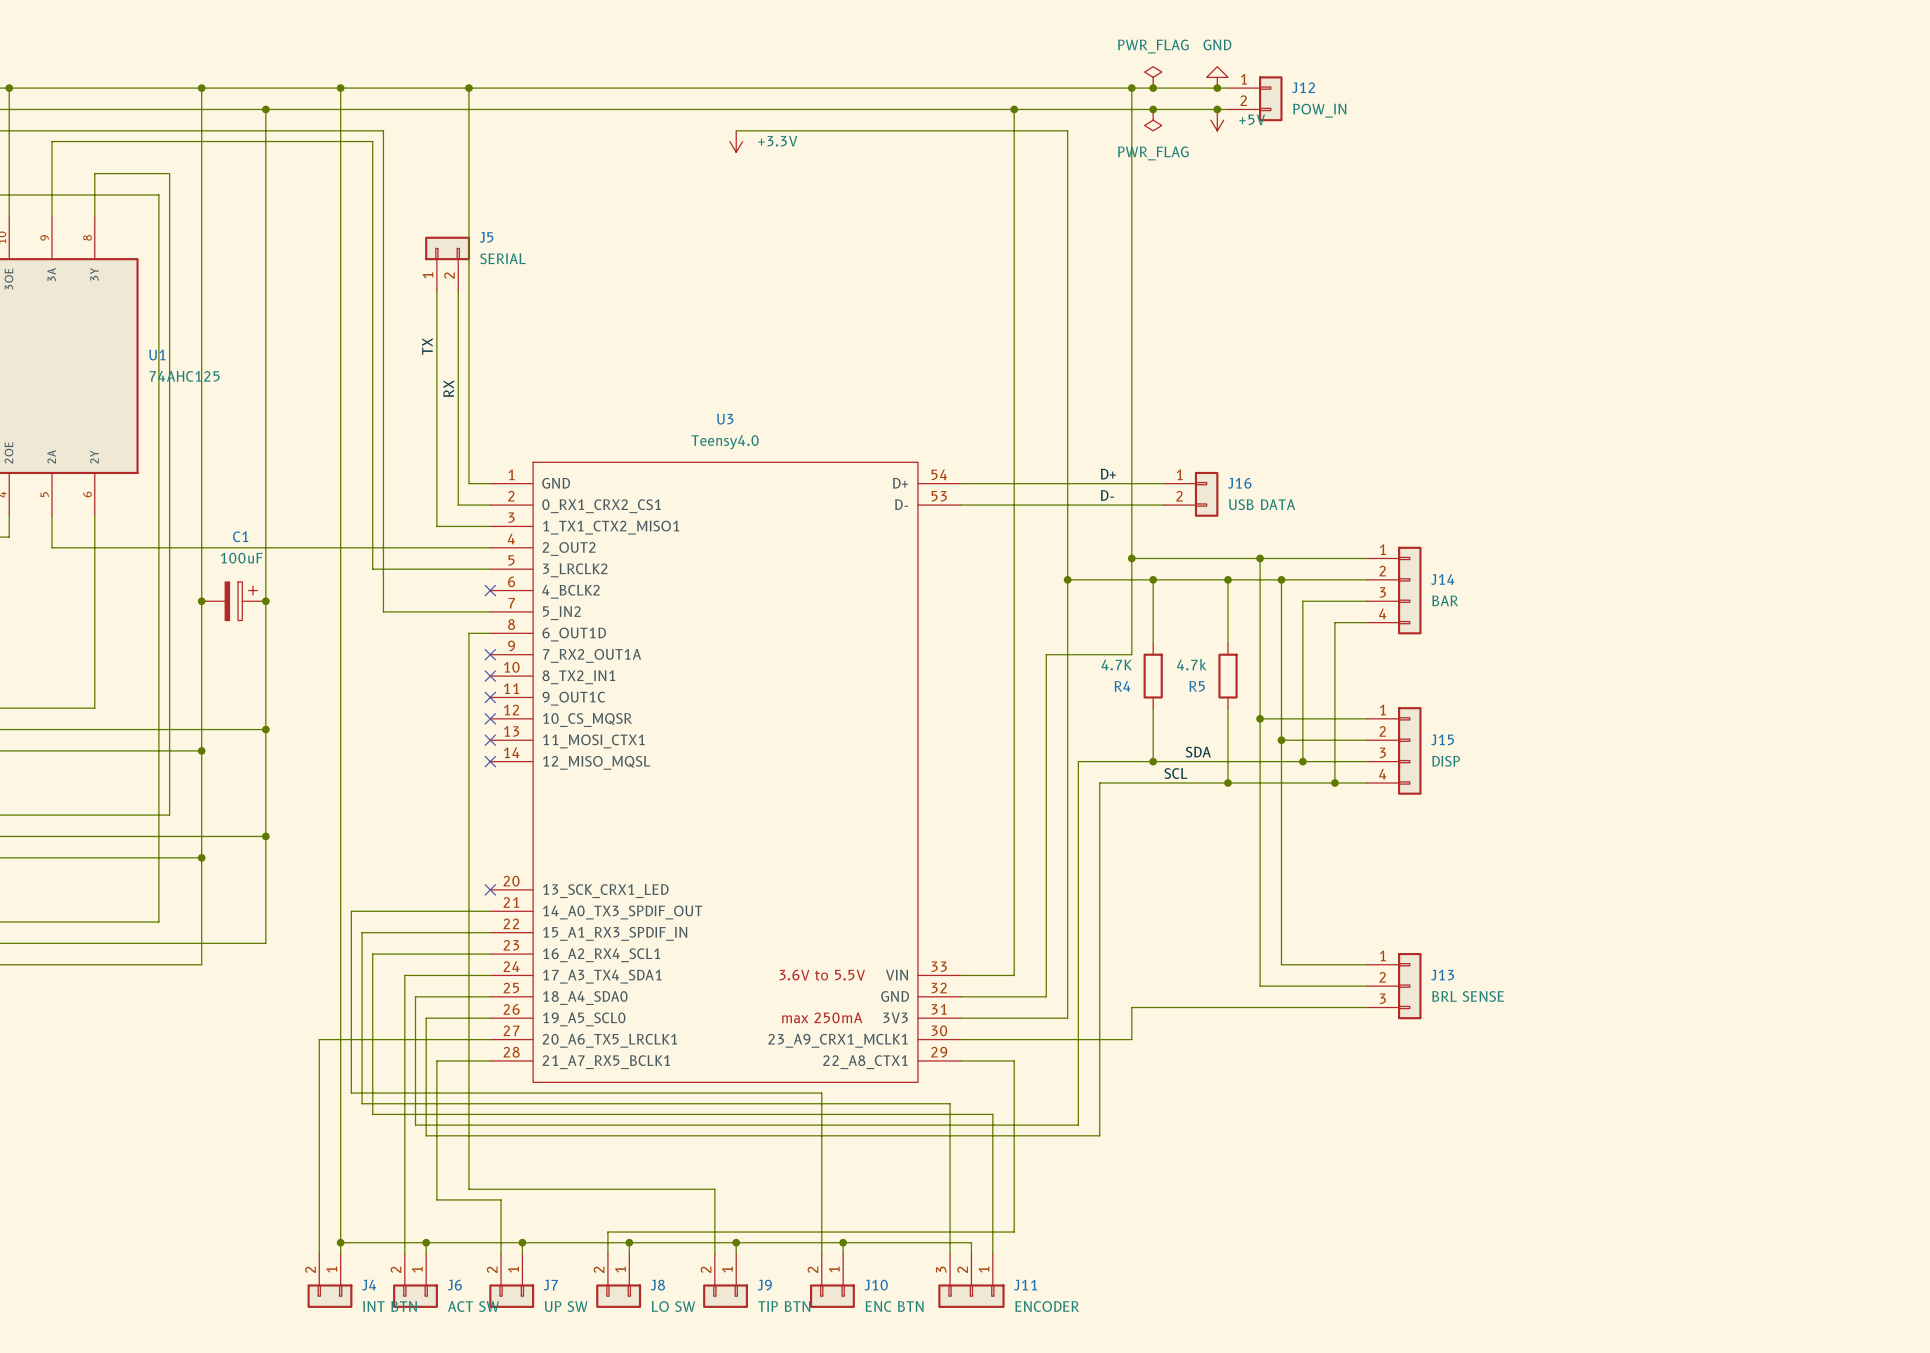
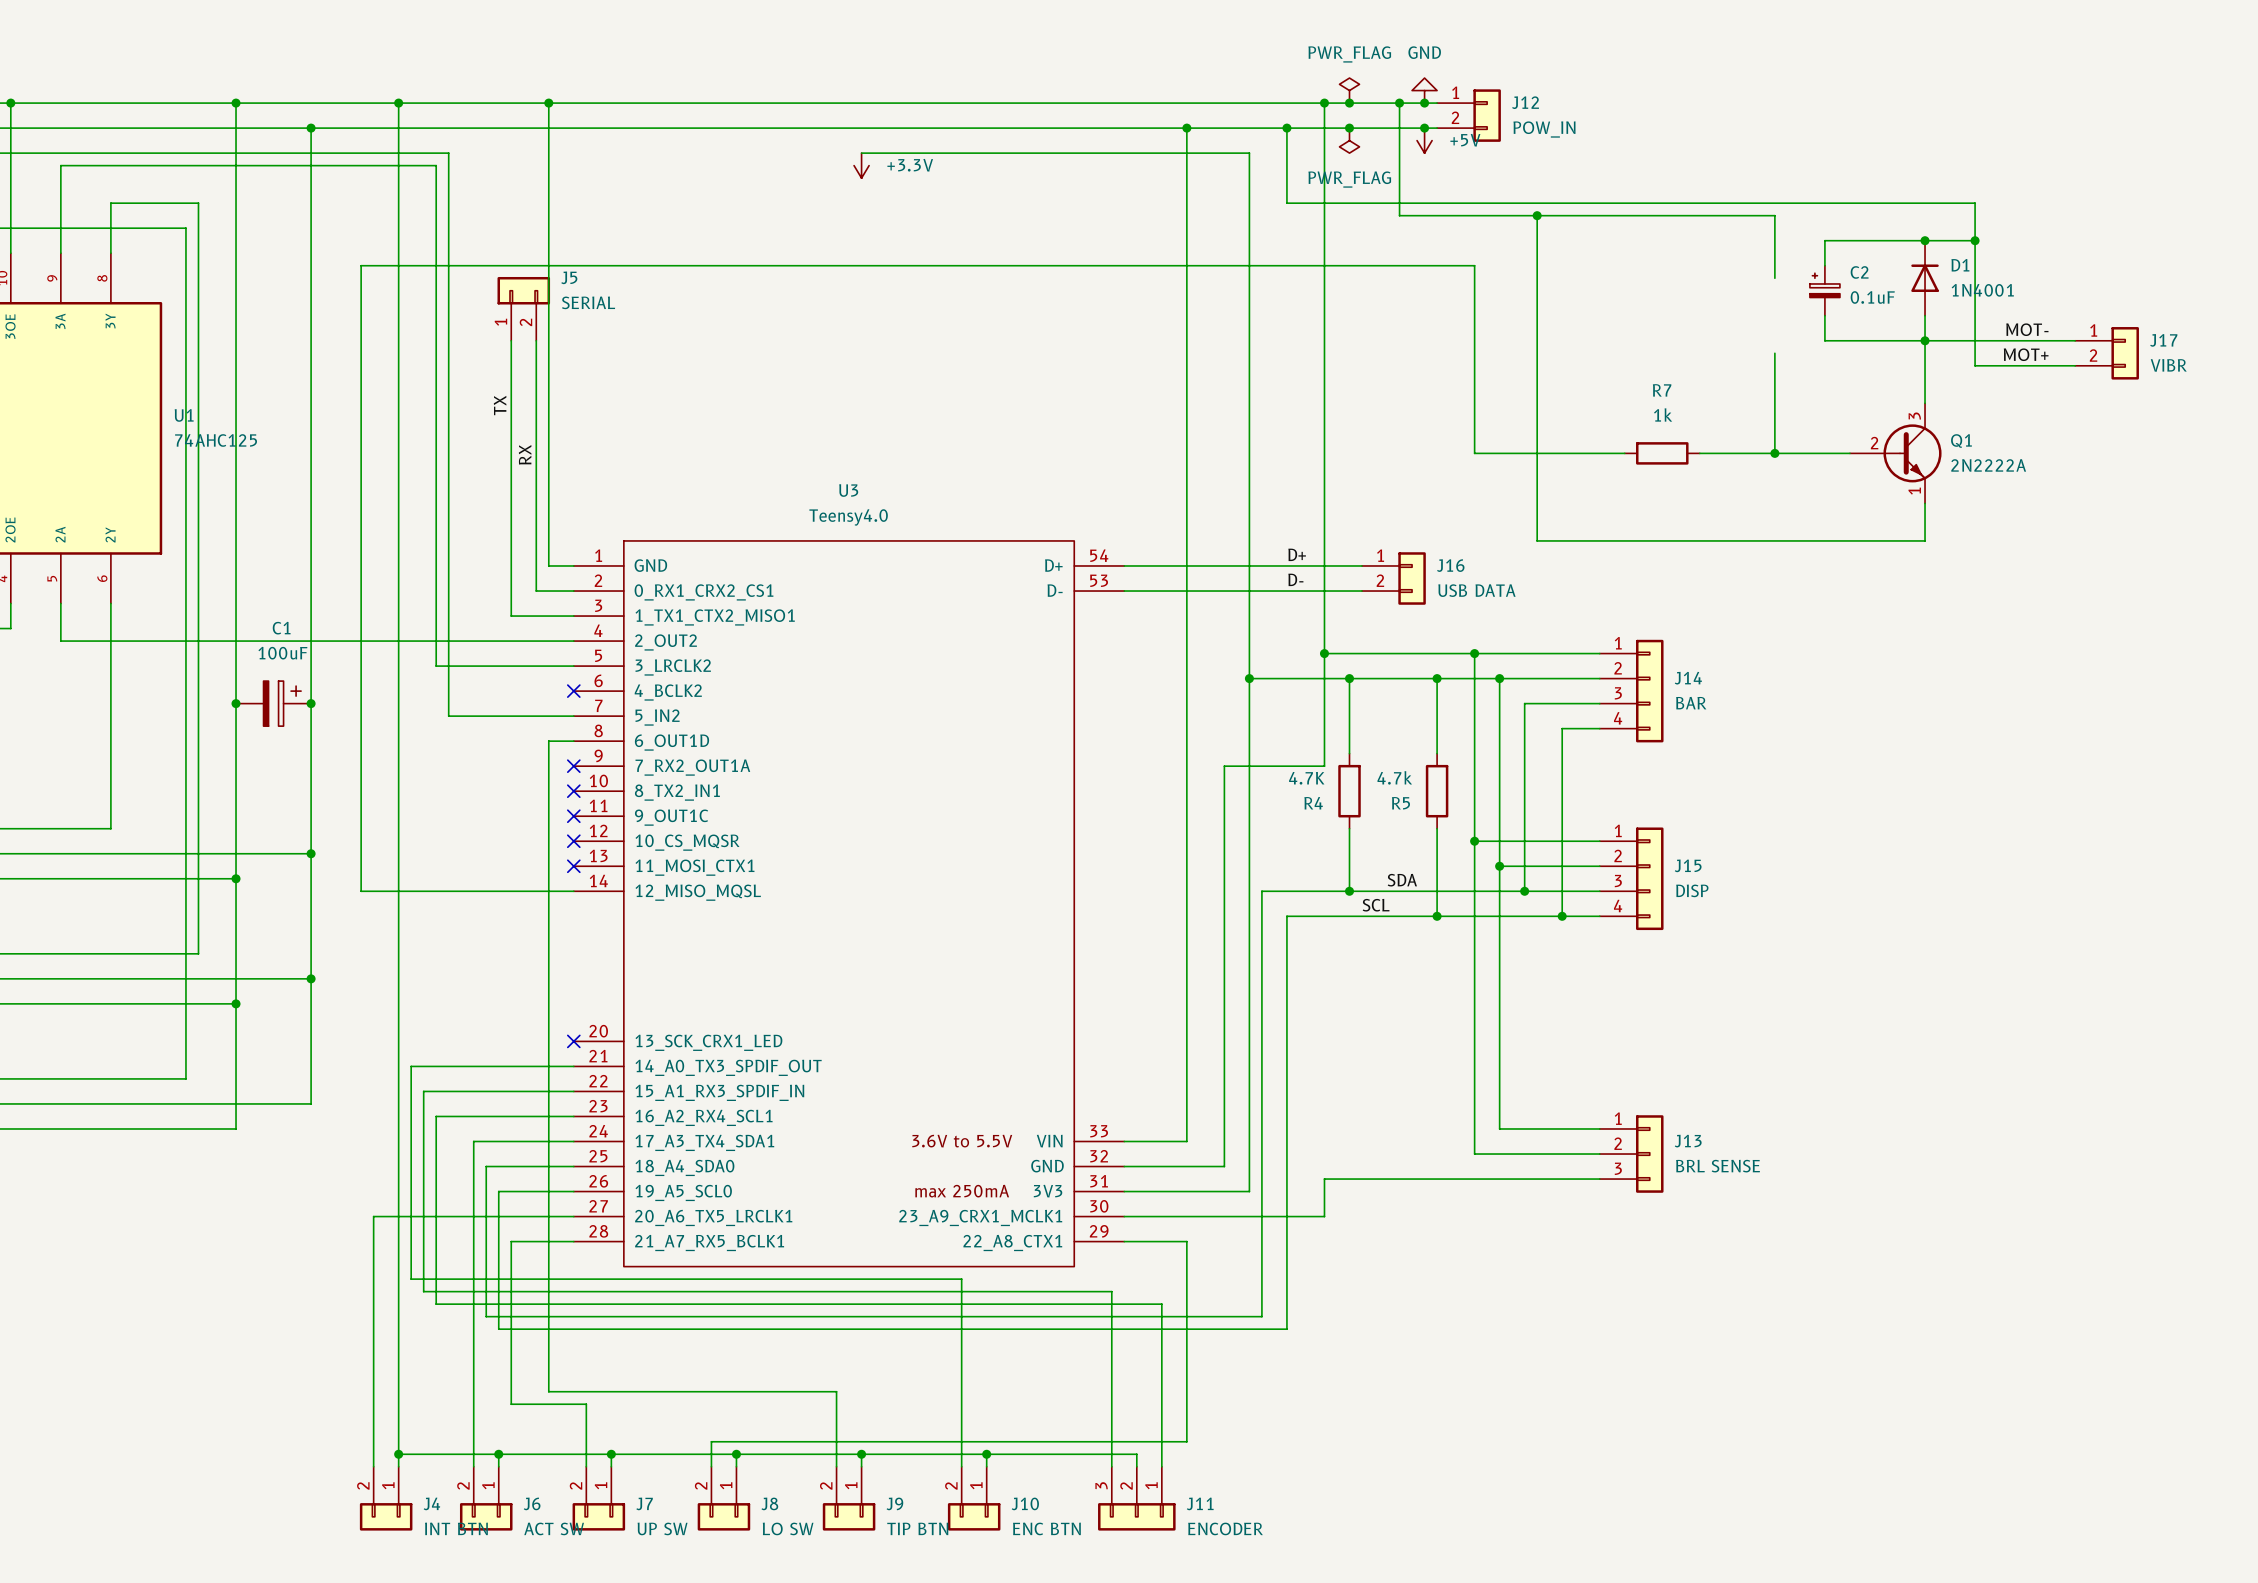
wire: none -> (1399, 103) (1399, 215) (1774, 215) (1774, 278)
junction: none -> (1399, 103)
wire: none -> (1286, 128) (1286, 203) (1975, 203) (1975, 365) (2075, 365)
junction: none -> (1286, 128)
wire: none -> (1537, 215) (1537, 540) (1925, 540) (1925, 503)
junction: none -> (1537, 215)
junction: none -> (1925, 240)
wire: none -> (1975, 240) (1824, 240) (1824, 265)
junction: none -> (1975, 240)
D1: none -> 1N4001 (1925, 278)
C2: none -> 0.1uF (1824, 290)
wire: none -> (1824, 315) (1824, 340) (2075, 340)
wire: none -> (1925, 315) (1925, 403)
label: none -> MOT- (2027, 329)
junction: none -> (1925, 340)
wire: none -> (1774, 353) (1774, 453)
J17: none -> VIBR (2107, 353)
label: none -> MOT+ (2026, 354)
wire: none -> (1624, 453) (1474, 453) (1474, 265) (361, 265) (361, 891) (573, 891)
R7: none -> 1k (1662, 453)
wire: none -> (1699, 453) (1849, 453)
junction: none -> (1774, 453)
Q1: none -> 2N2222A (1895, 453)
no-connect mark: (490, 761) -> none

